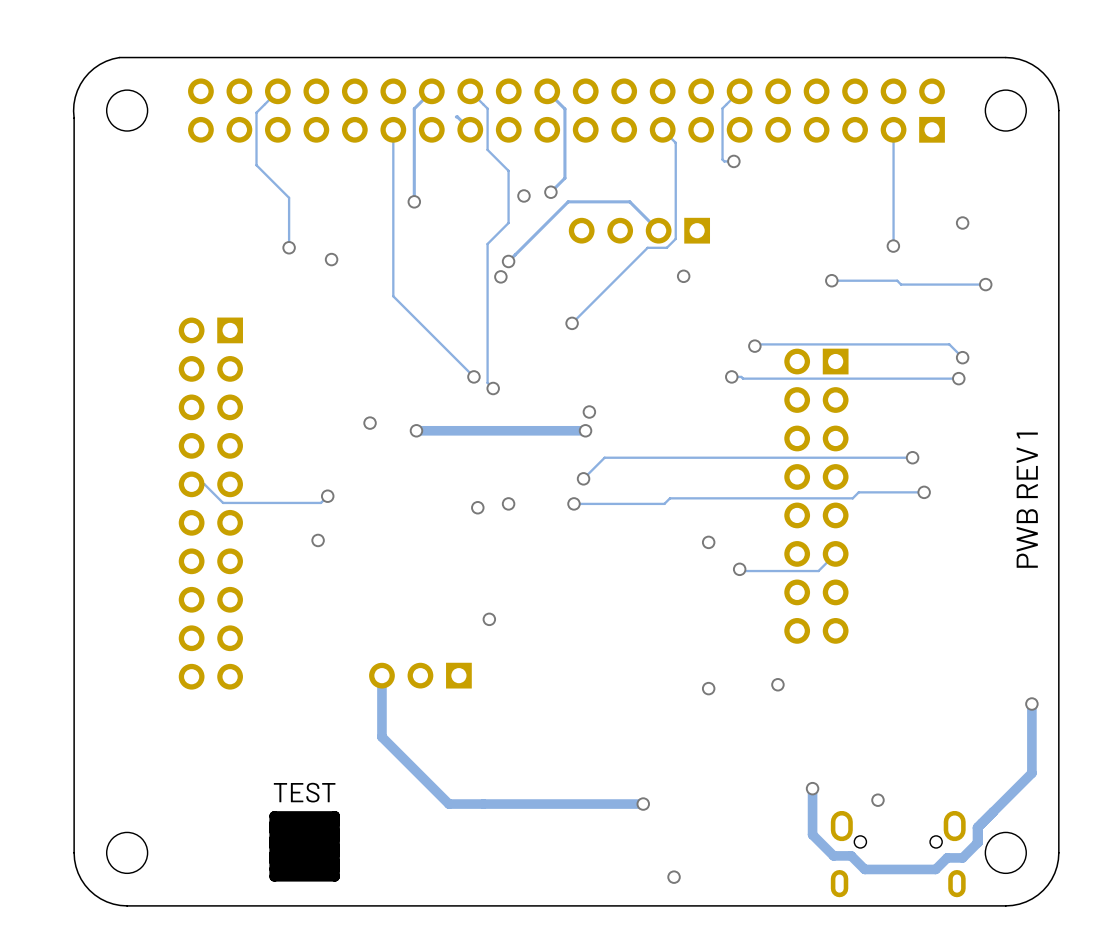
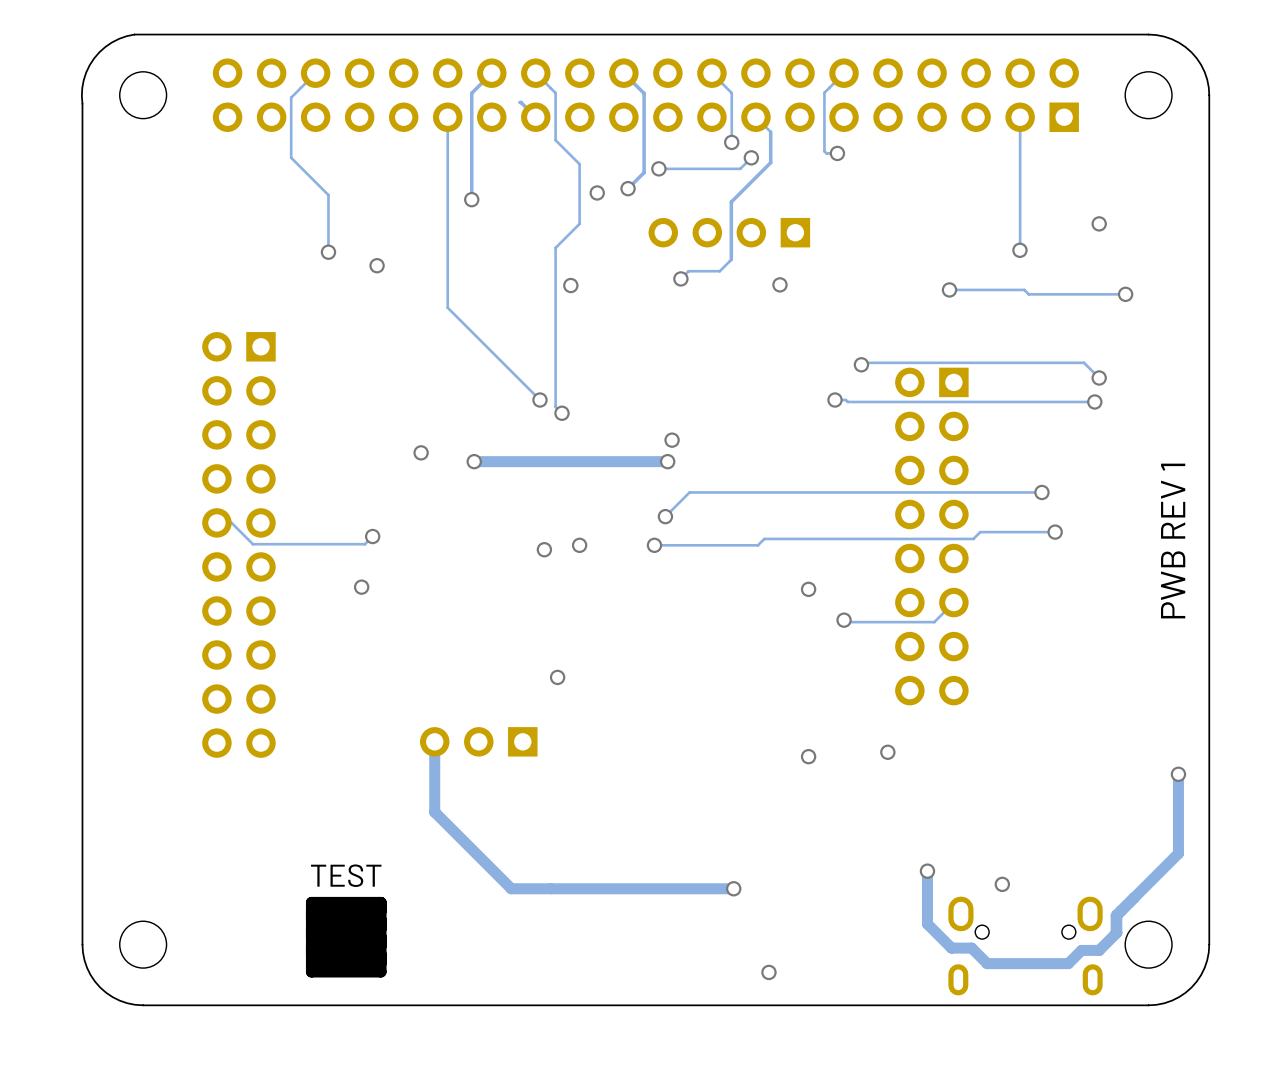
track: none -> (711, 73) (731, 93) (731, 142)
track: (675, 142) (675, 238) (666, 247) (647, 247) (641, 254) -> (770, 131) (770, 162) (731, 202) (731, 259)
via: none -> (731, 142)
track: none -> (751, 157) (740, 168) (658, 168)
via: none -> (751, 157)
via: none -> (658, 168)
track: (658, 230) (629, 201) (568, 201) (508, 261) -> none
via: (508, 261) -> none
track: (631, 264) (572, 323) -> (719, 271) (688, 271) (680, 278)
via: none -> (680, 278)
via: (572, 323) -> none

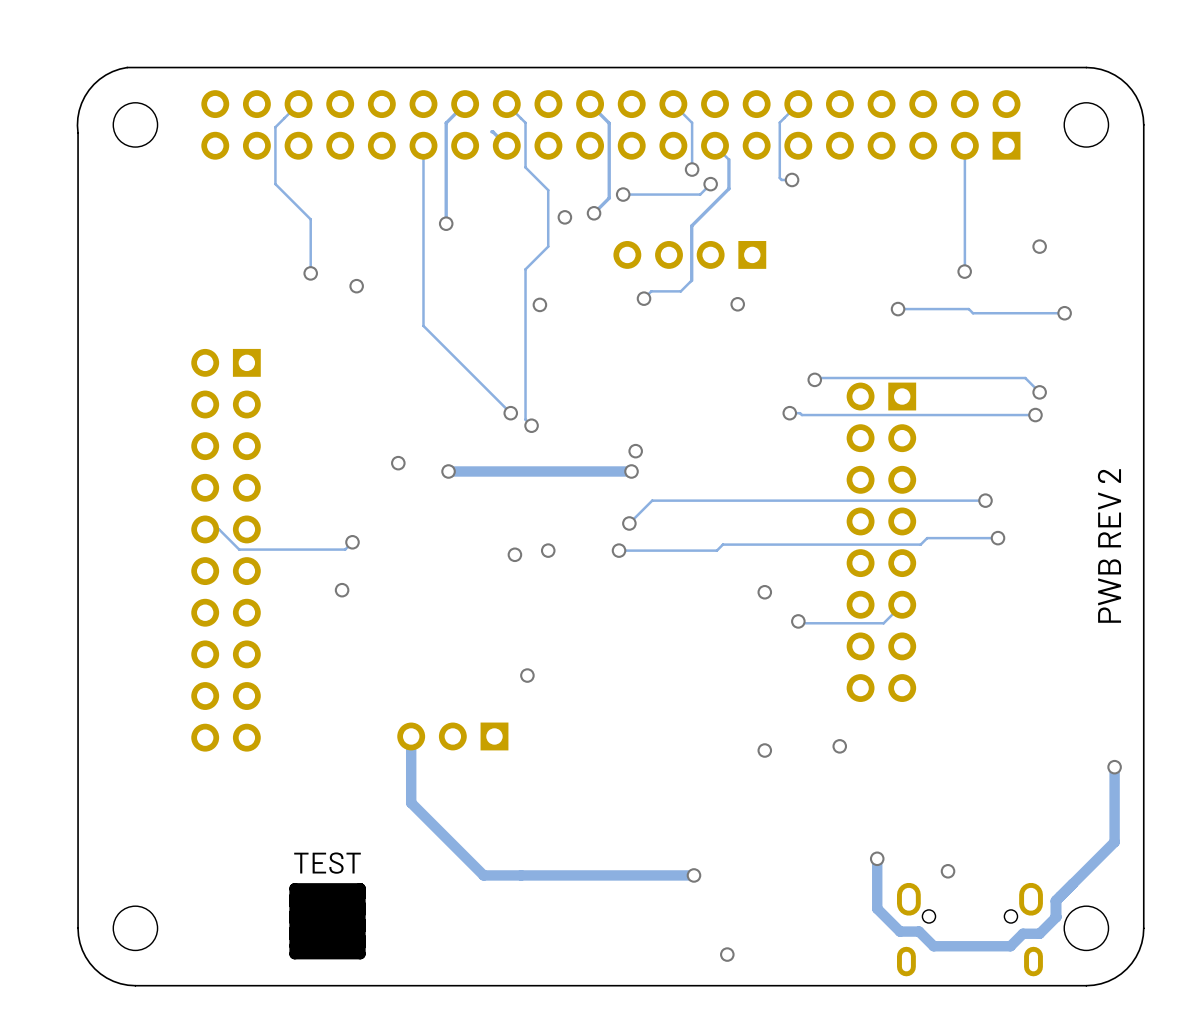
text: PWB REV 1 (1173, 541) -> PWB REV 2 (1109, 545)

